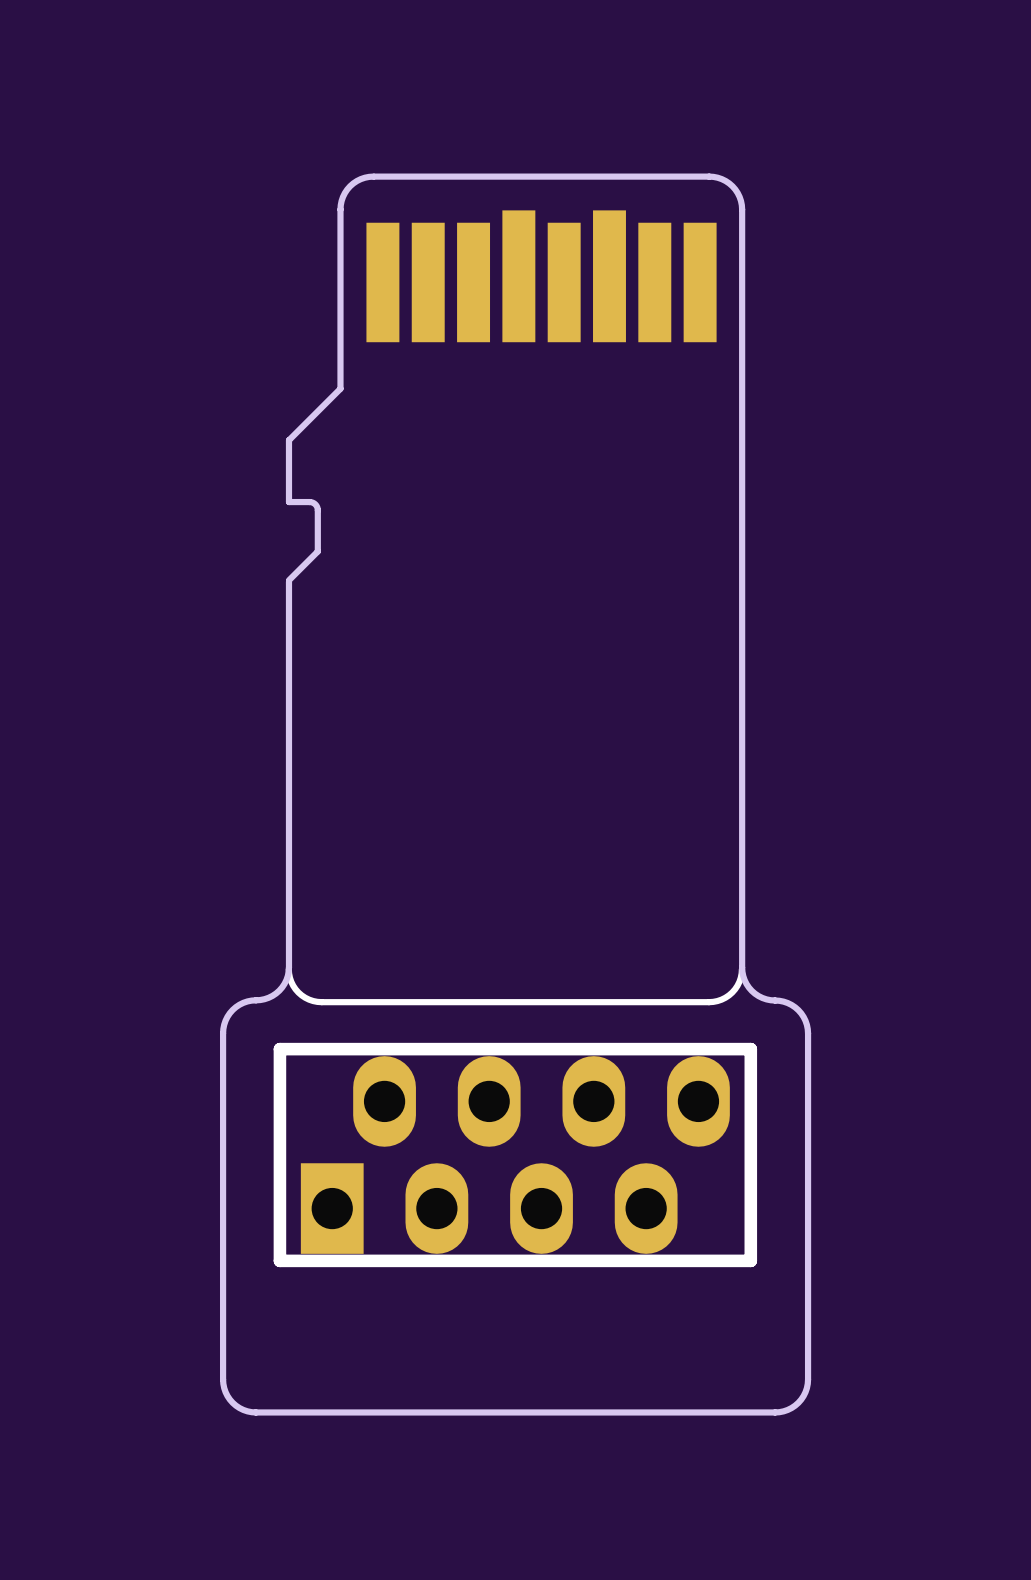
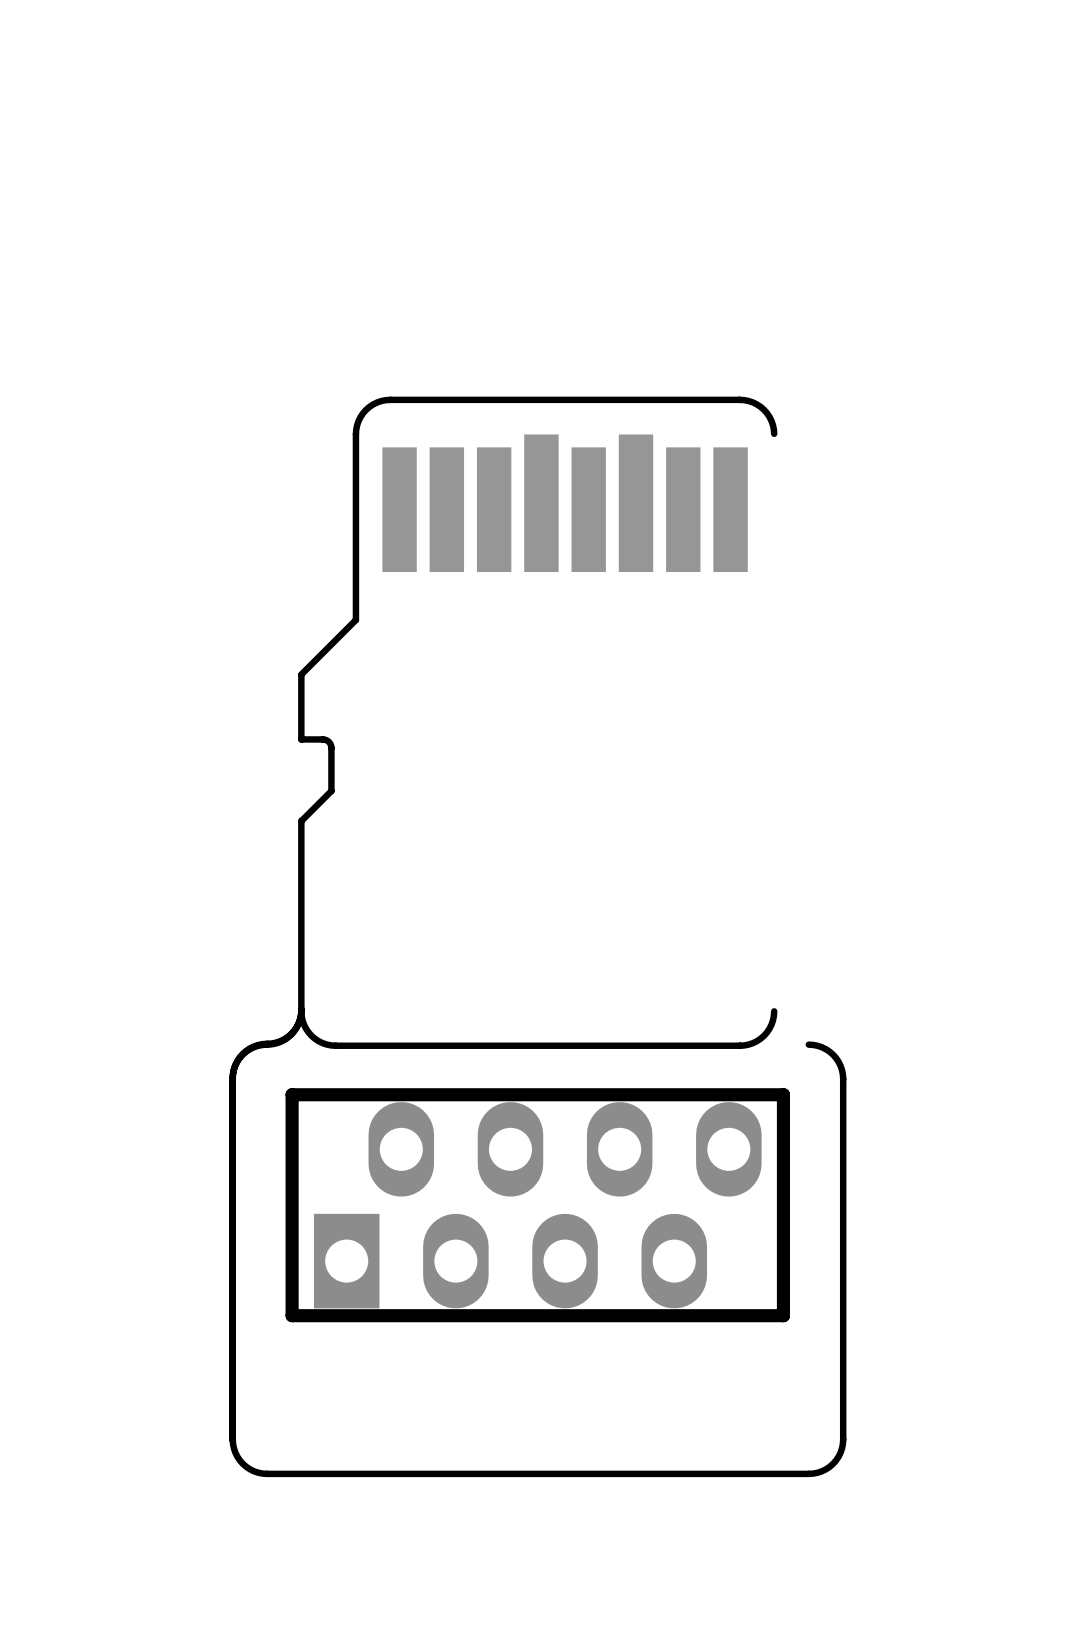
board edge: (373, 176) (360, 179) (350, 186) (342, 196) (340, 205) (340, 388) (288, 440) (288, 502) (311, 502) (316, 505) (317, 510) (317, 551) (288, 580) -> none
board edge: (374, 176) (709, 176) (725, 181) (737, 193) (742, 209) (742, 971) (746, 984) (755, 993) (766, 999) (787, 1003) (798, 1010) (805, 1020) (808, 1033) -> (808, 1044) (821, 1047) (833, 1054) (840, 1065) (843, 1079)
part position: (541, 276) -> (565, 503)
board edge: none -> (739, 399) (752, 402) (763, 409) (771, 420) (774, 433)
board edge: none -> (739, 399) (385, 400) (373, 404) (363, 413) (357, 425) (355, 434)
board edge: none -> (355, 434) (355, 619) (301, 674) (301, 739) (323, 739) (330, 743) (331, 791) (301, 821) (301, 1014) (296, 1027) (287, 1037) (280, 1042) (258, 1045) (246, 1051) (237, 1061) (232, 1074) (232, 1440)
board edge: (288, 581) (288, 967) -> none

